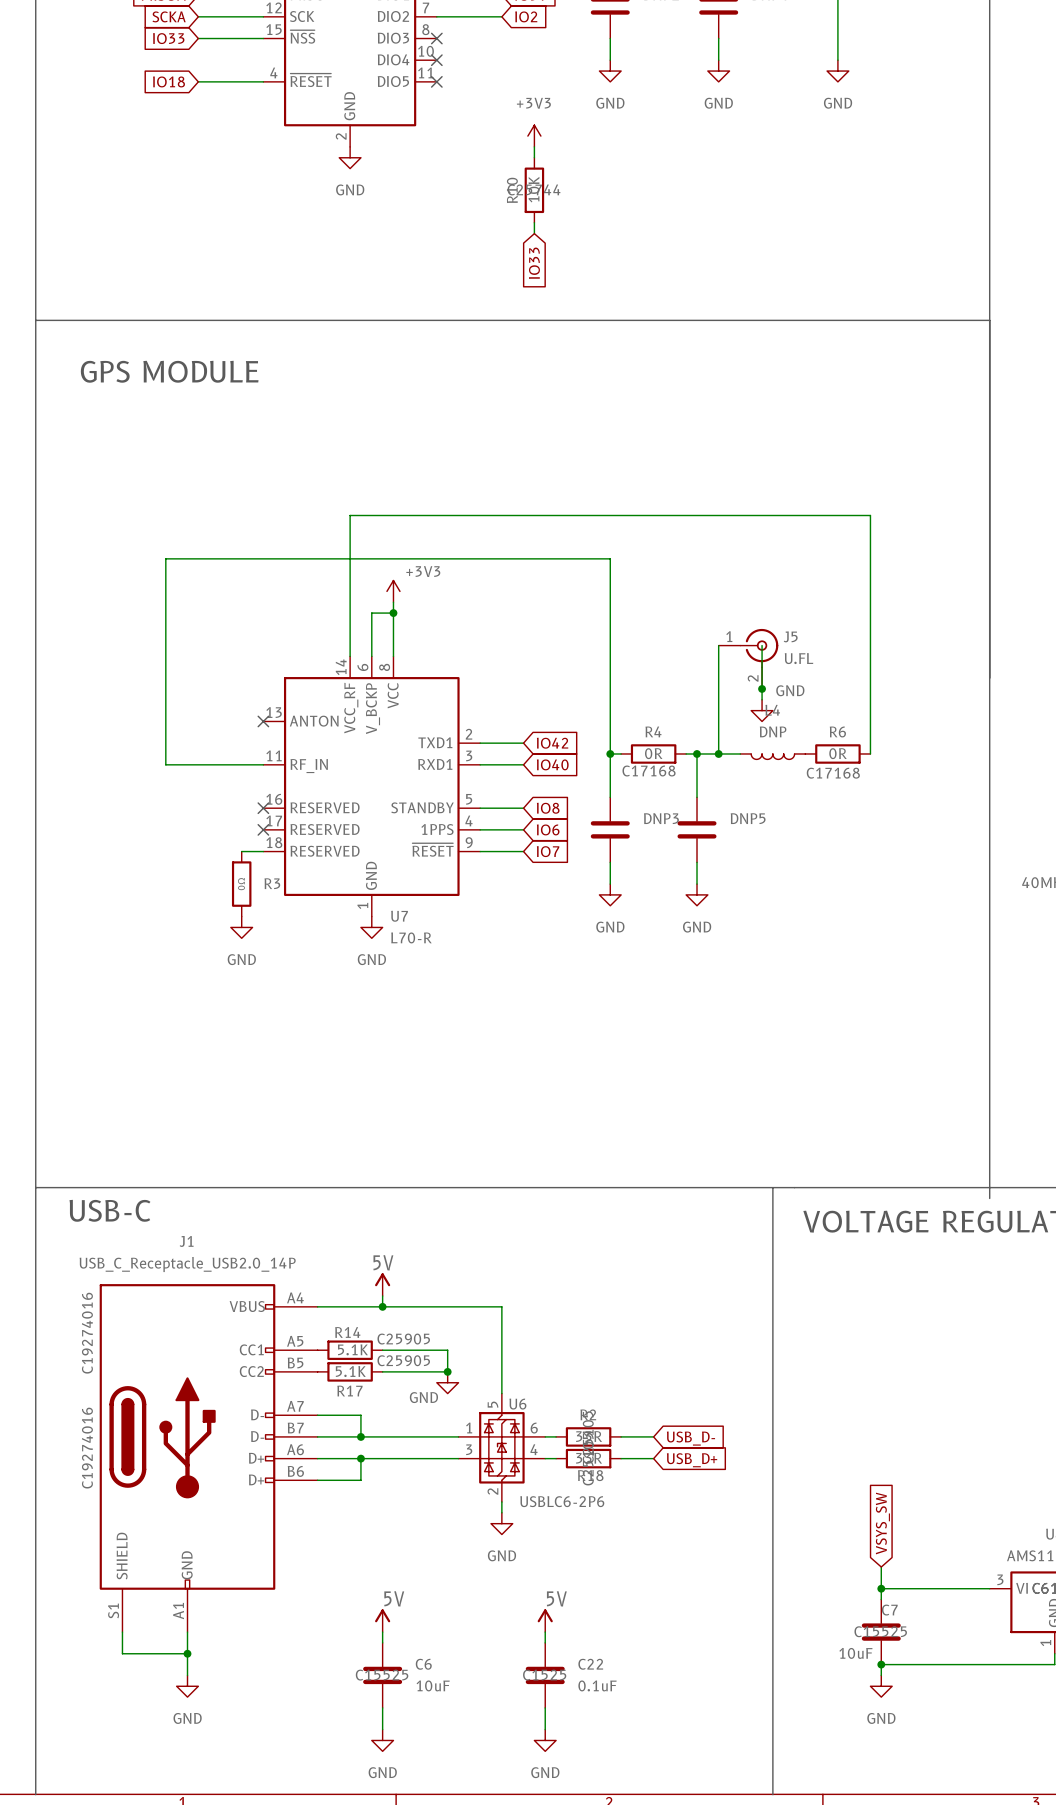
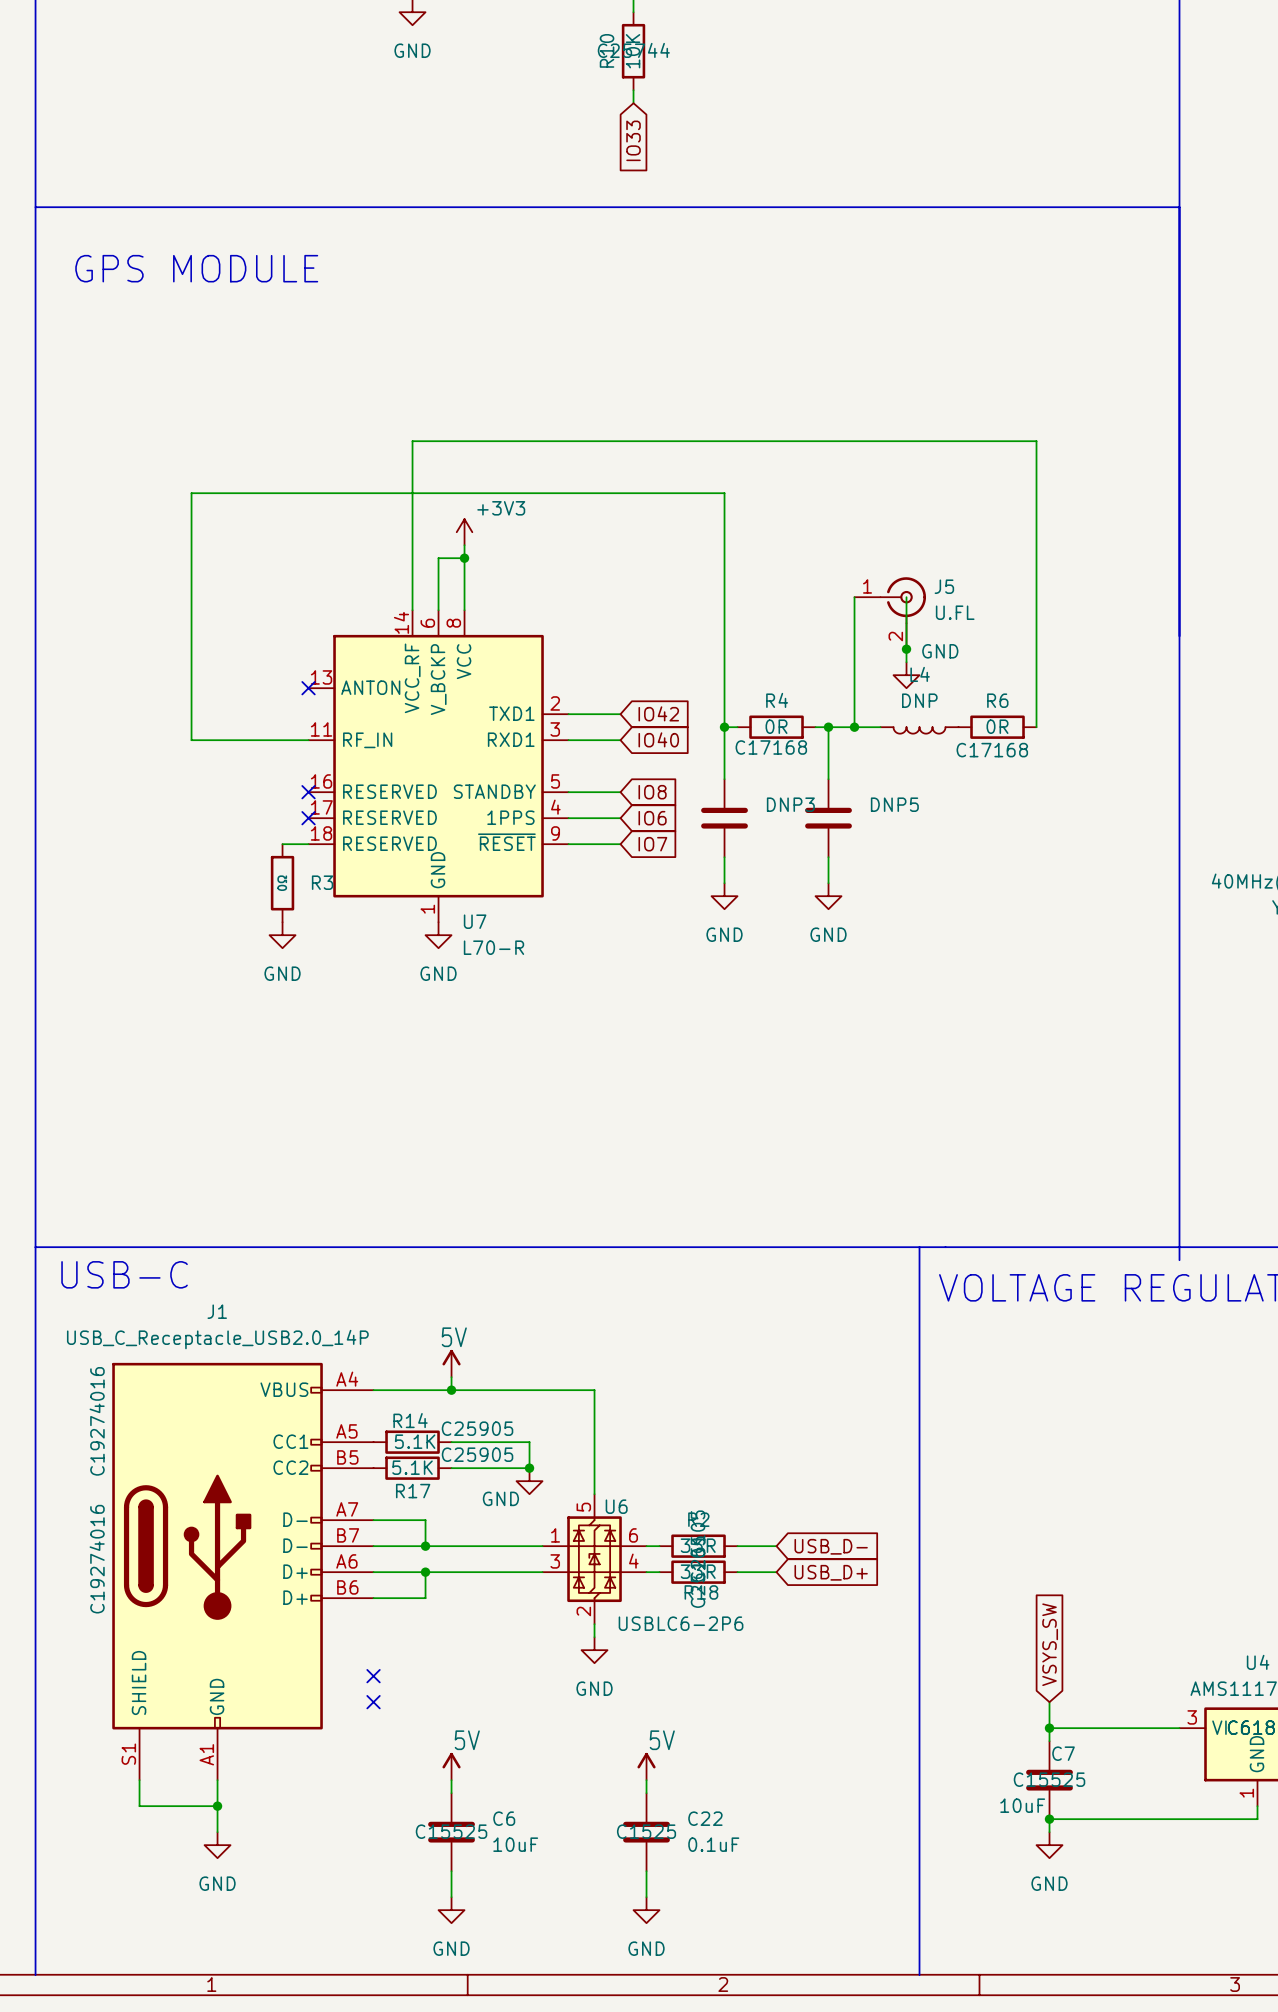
no-connect mark: none -> (373, 1676)
no-connect mark: none -> (373, 1702)

